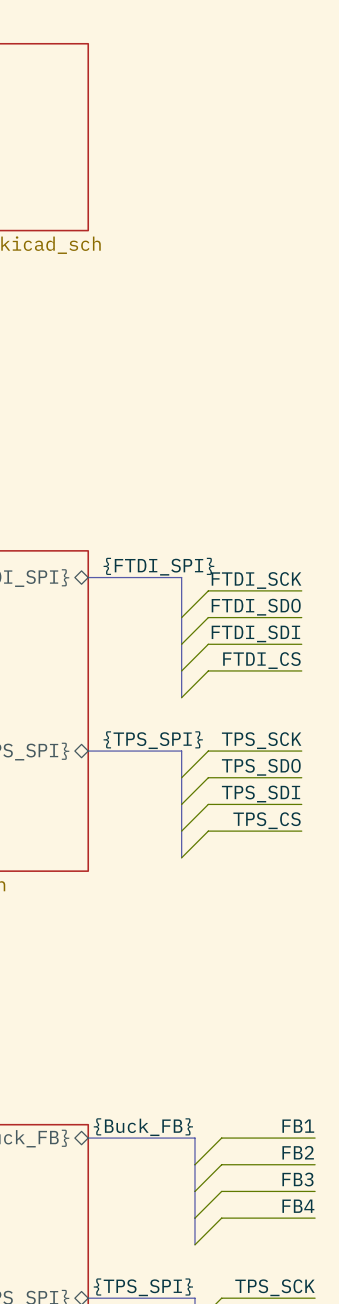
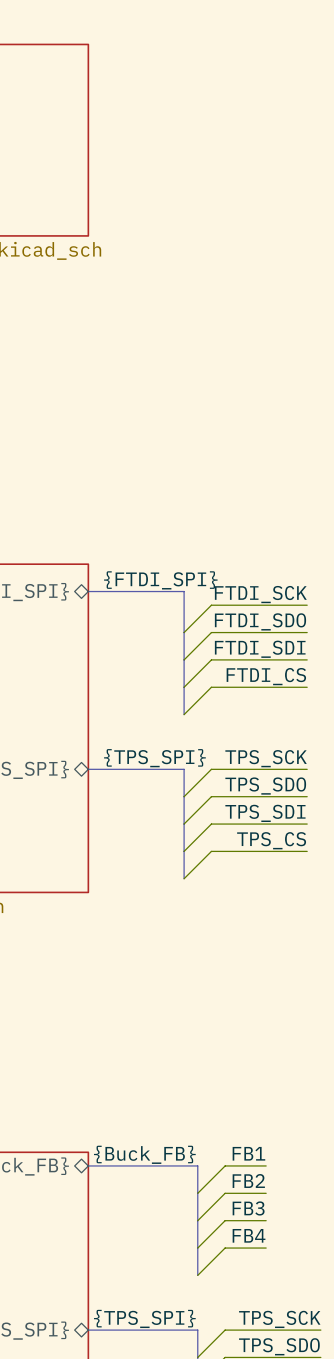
label position: FB1 (298, 1126) -> FB1 (248, 1153)
wire: (261, 1138) (315, 1138) -> none
label position: FB2 (298, 1152) -> FB2 (248, 1181)
wire: (261, 1164) (315, 1164) -> none
label position: FB3 (297, 1179) -> FB3 (248, 1208)
wire: (261, 1191) (315, 1191) -> none
label position: FB4 (298, 1206) -> FB4 (249, 1235)
wire: (261, 1218) (315, 1218) -> none

